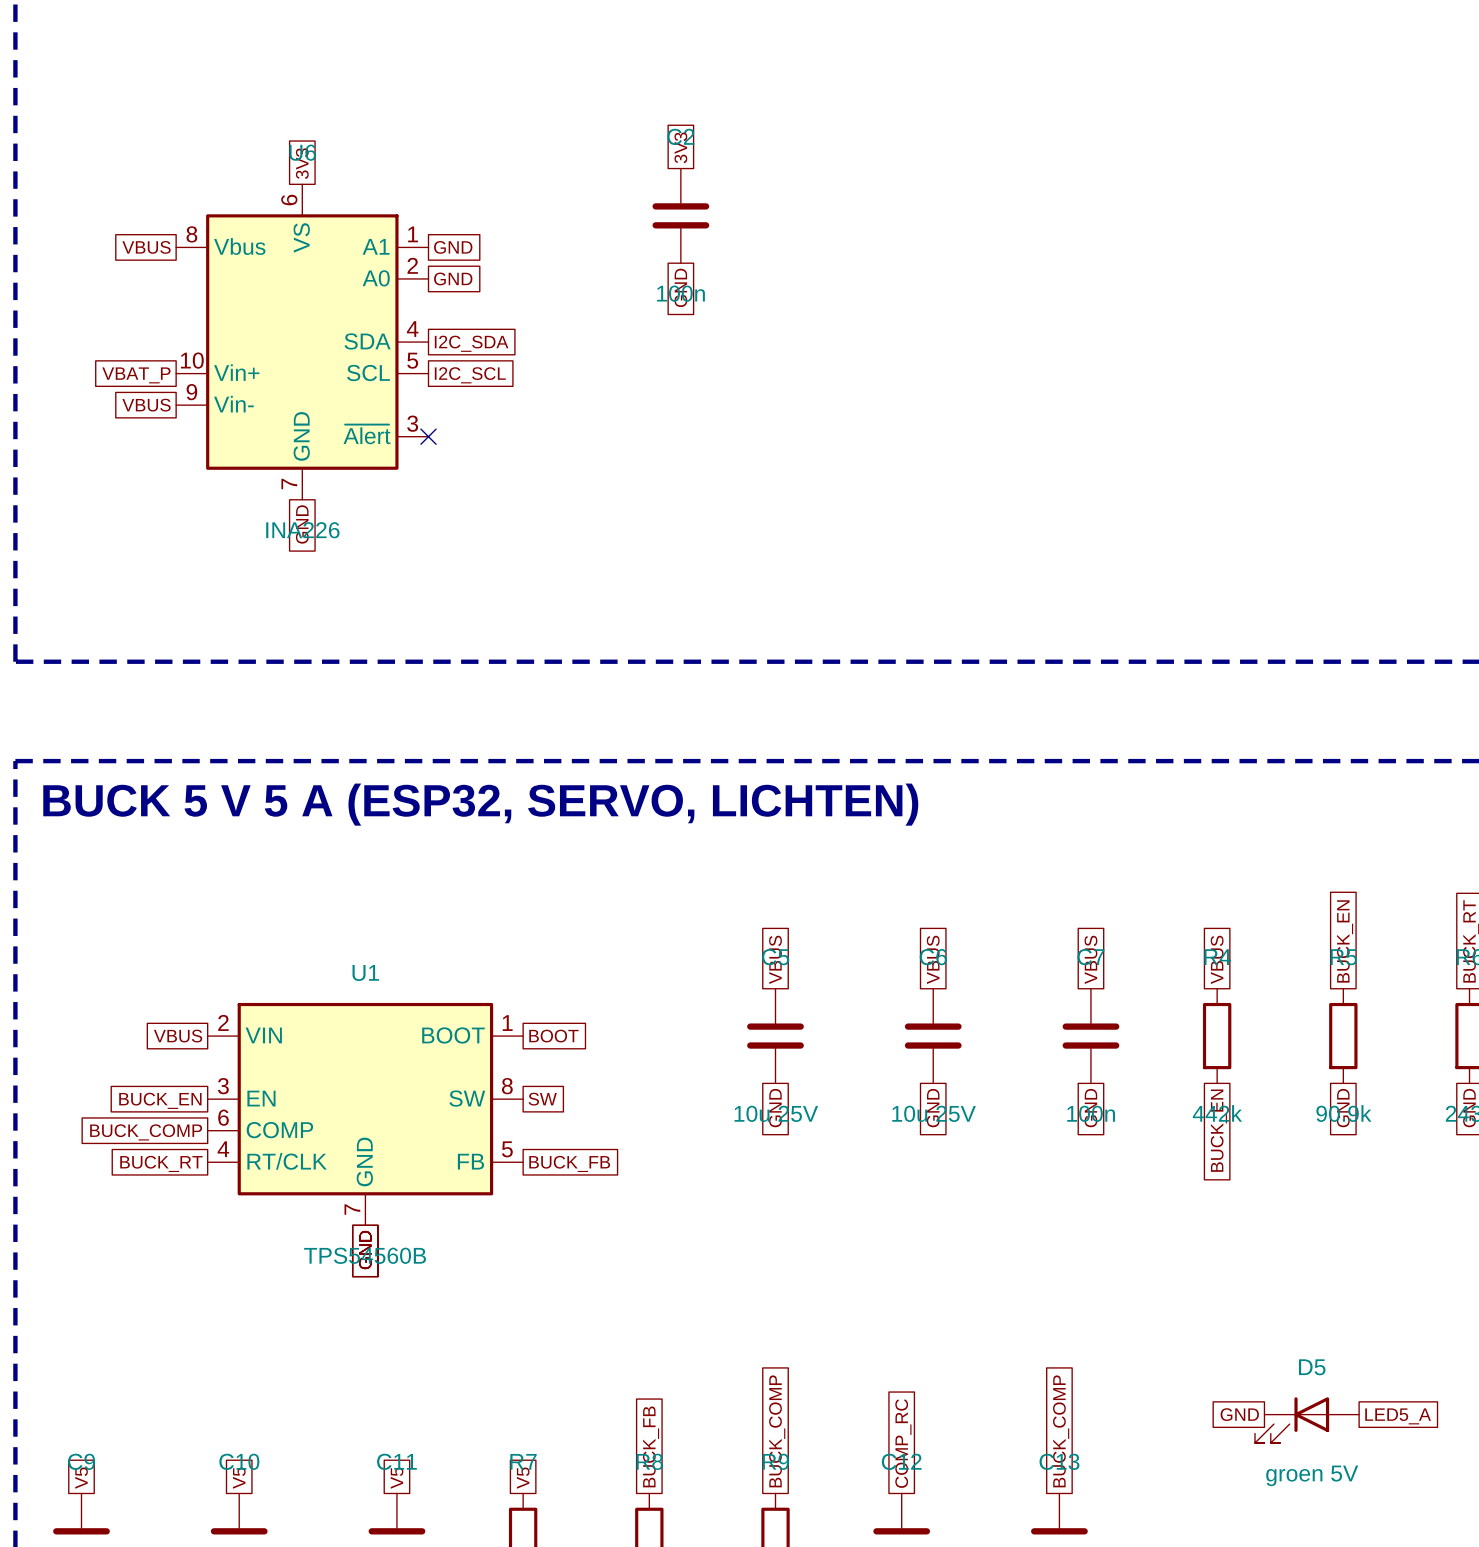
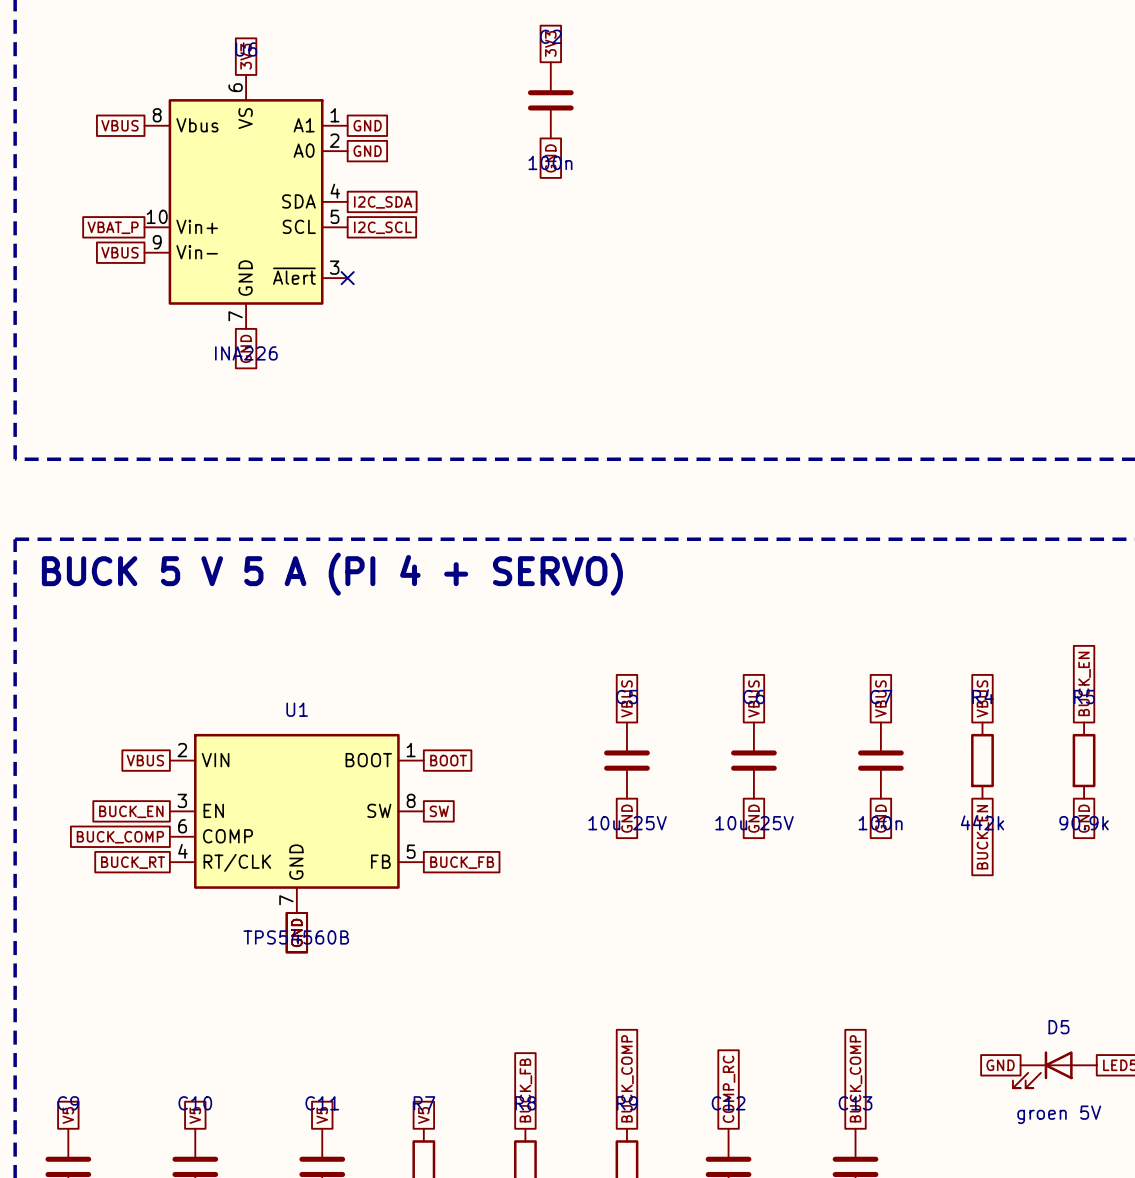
text: BUCK 5 V 5 A (ESP32, SERVO, LICHTEN) (480, 804) -> BUCK 5 V 5 A (PI 4 + SERVO) (332, 574)

